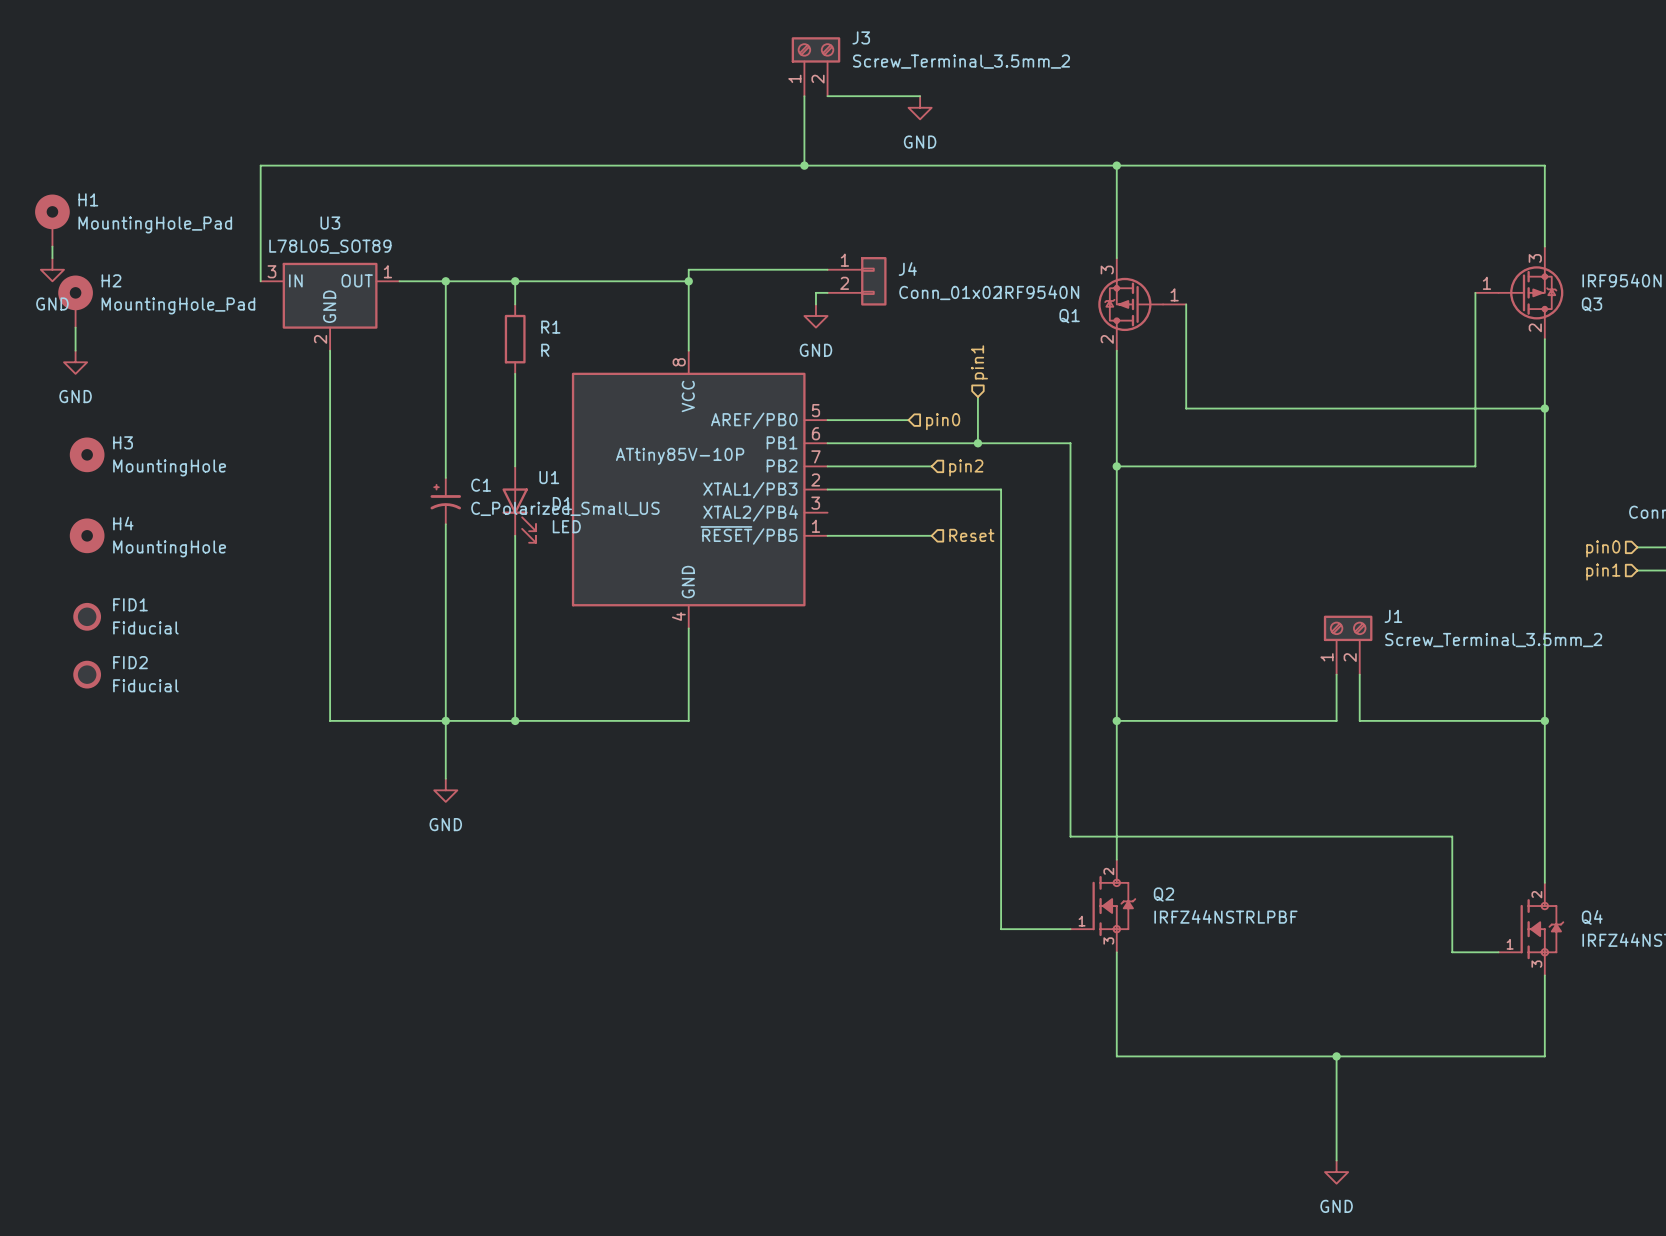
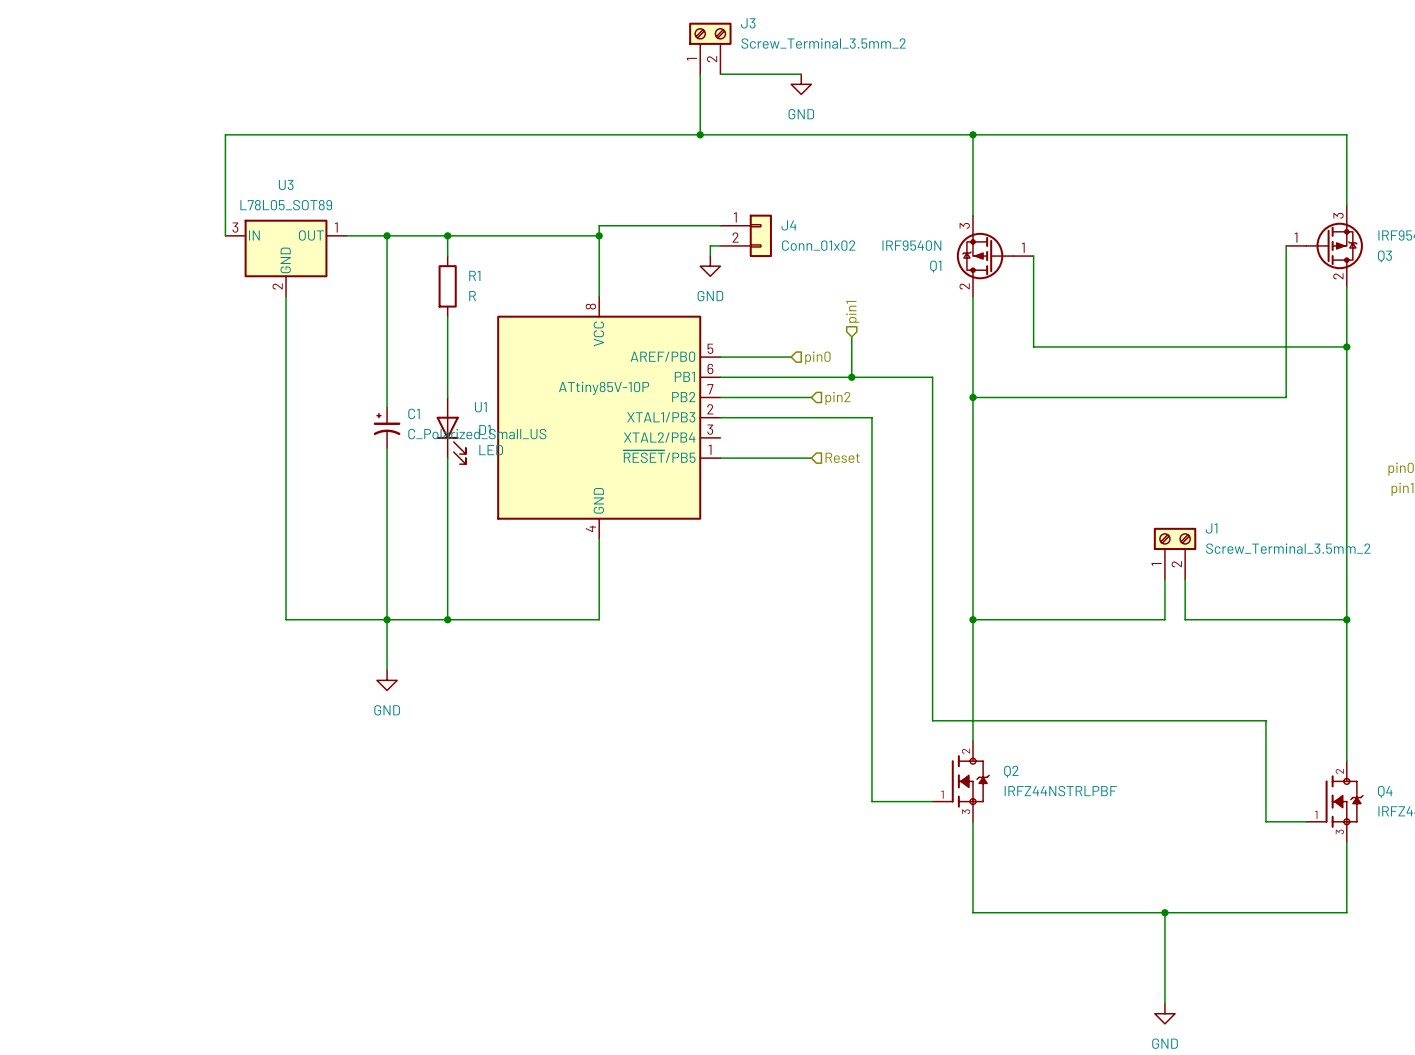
H1: MountingHole_Pad (52, 220) -> none
wire: (52, 246) (52, 258) -> none
power symbol: GND (52, 269) -> none
H2: MountingHole_Pad (75, 301) -> none
wire: (75, 327) (75, 350) -> none
power symbol: GND (75, 362) -> none
H3: MountingHole (87, 454) -> none
H4: MountingHole (87, 535) -> none
FID1: Fiducial (87, 616) -> none
FID2: Fiducial (87, 674) -> none

